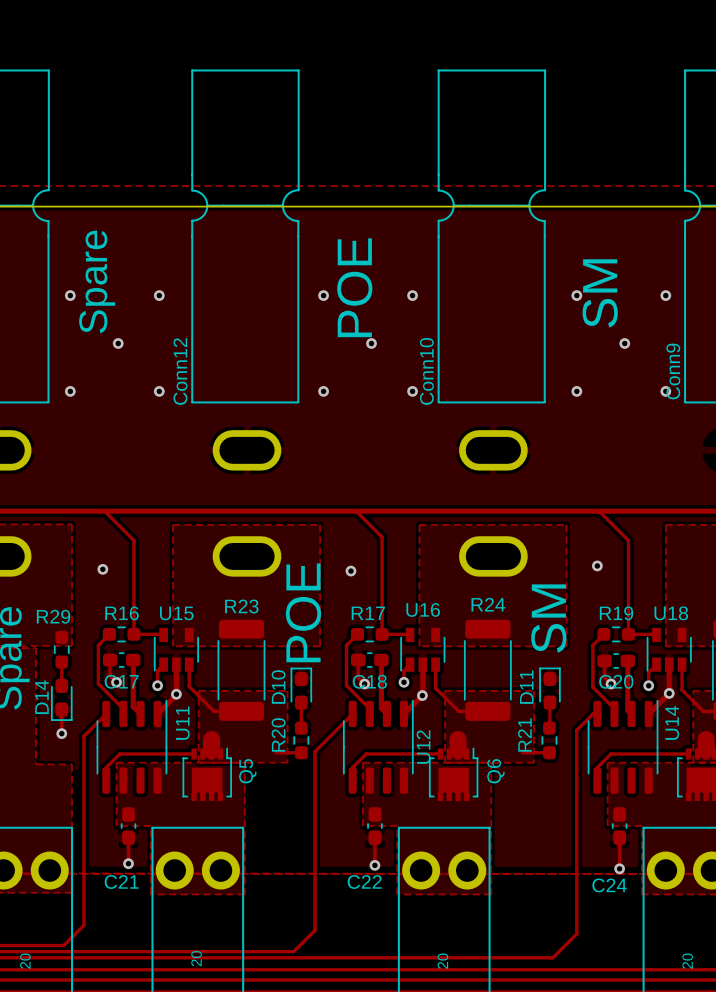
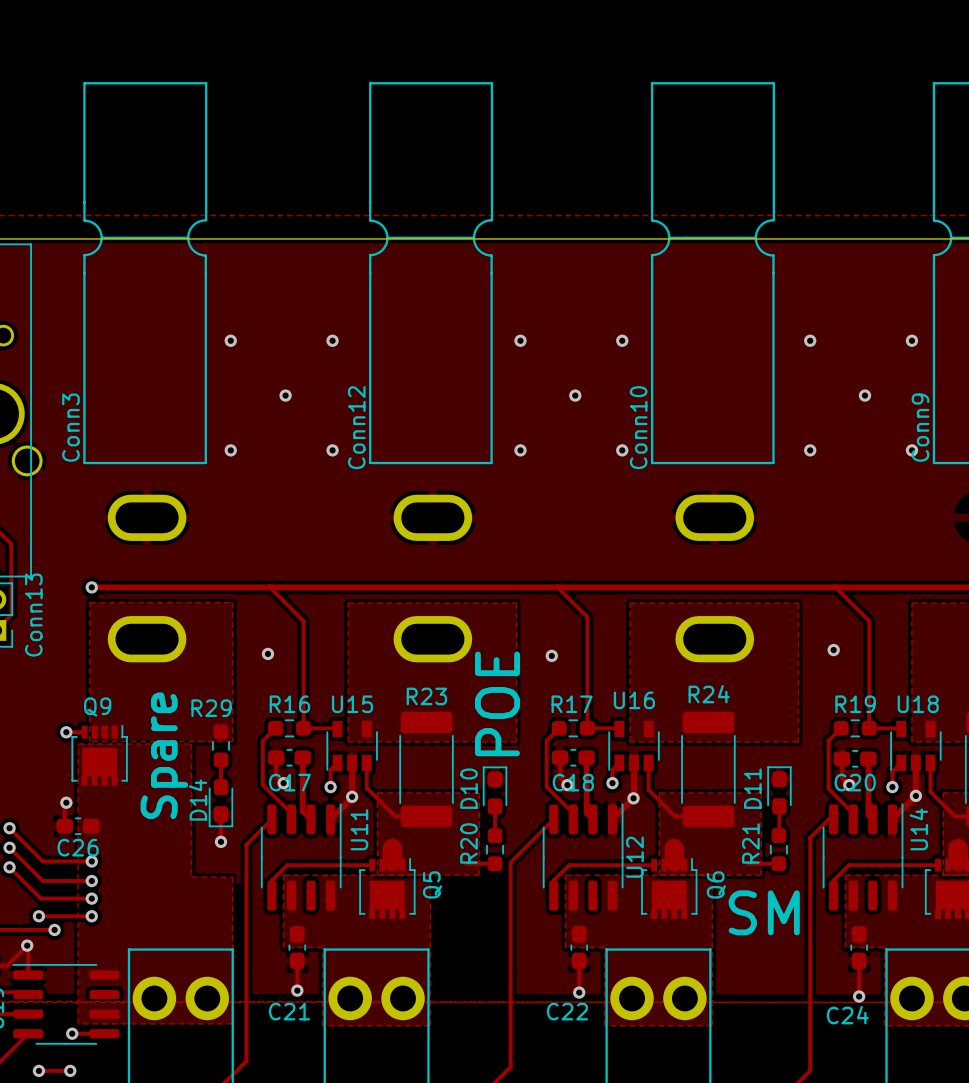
text: Spare (97, 281) -> none
text: POE (354, 287) -> none
text: SM (600, 293) -> none
text rotation: 0° (548, 618) -> 90° clockwise (764, 912)
text position: SM (548, 618) -> SM (764, 912)

